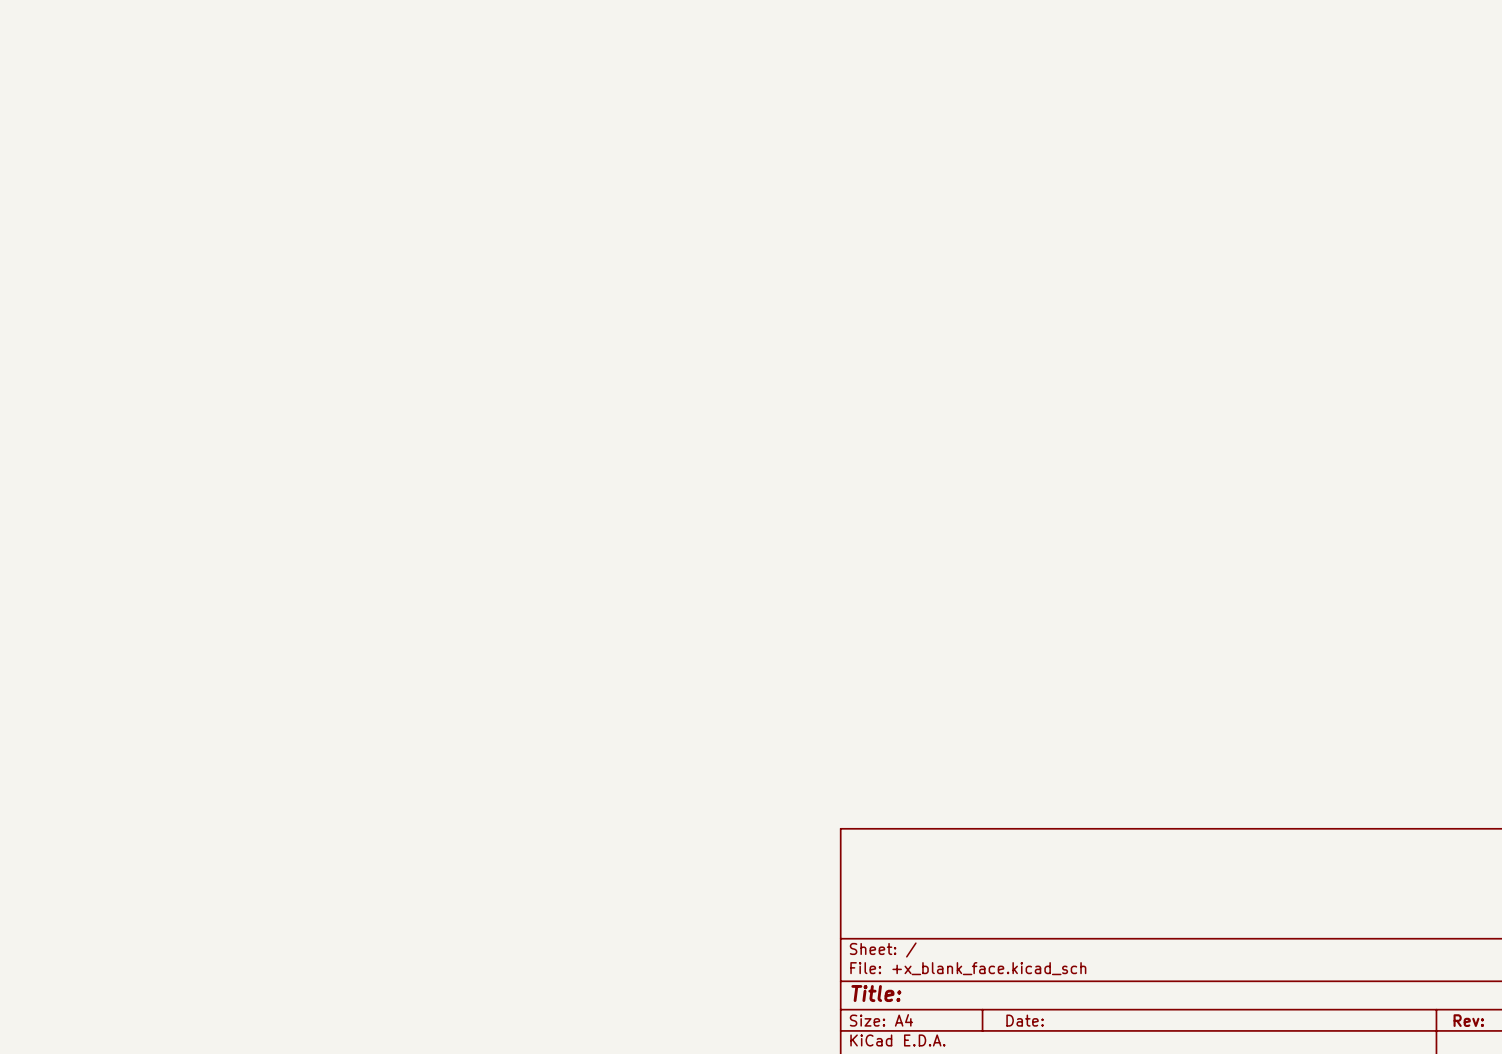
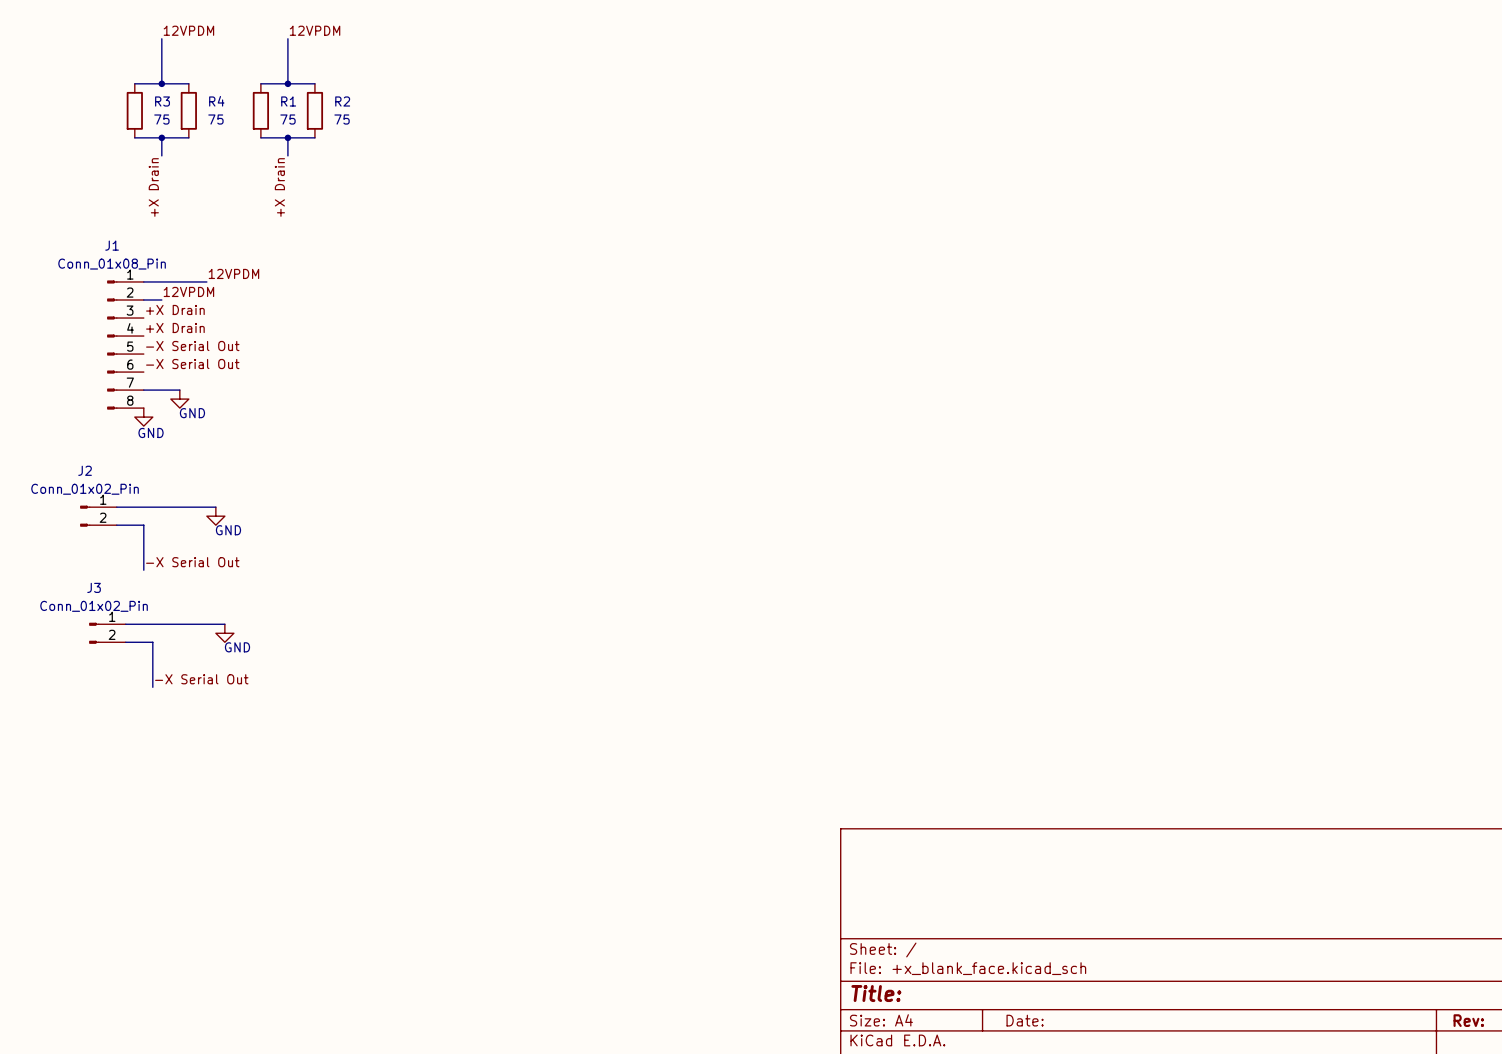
label: none -> 12VPDM (188, 30)
label: none -> 12VPDM (315, 30)
wire: none -> (161, 38) (161, 83)
wire: none -> (287, 38) (287, 83)
wire: none -> (134, 83) (188, 83)
junction: none -> (161, 83)
wire: none -> (260, 83) (314, 83)
junction: none -> (287, 83)
R3: none -> 75 (134, 110)
R4: none -> 75 (188, 110)
R1: none -> 75 (260, 110)
R2: none -> 75 (314, 110)
wire: none -> (134, 137) (188, 137)
wire: none -> (161, 137) (161, 155)
junction: none -> (161, 137)
wire: none -> (260, 137) (314, 137)
wire: none -> (287, 137) (287, 155)
junction: none -> (287, 137)
label: none -> +X Drain (153, 187)
label: none -> +X Drain (279, 187)
label: none -> 12VPDM (233, 273)
wire: none -> (143, 281) (206, 281)
label: none -> 12VPDM (188, 291)
wire: none -> (143, 300) (161, 300)
label: none -> +X Drain (175, 309)
label: none -> +X Drain (175, 327)
J1: none -> Conn_01x08_Pin (125, 345)
label: none -> -X Serial Out (192, 346)
label: none -> -X Serial Out (192, 364)
wire: none -> (143, 390) (179, 390)
power symbol: none -> GND (179, 399)
power symbol: none -> GND (143, 417)
wire: none -> (116, 507) (215, 507)
J2: none -> Conn_01x02_Pin (98, 516)
power symbol: none -> GND (215, 516)
wire: none -> (116, 525) (143, 525) (143, 570)
label: none -> -X Serial Out (192, 562)
wire: none -> (125, 624) (224, 624)
J3: none -> Conn_01x02_Pin (107, 633)
power symbol: none -> GND (224, 633)
wire: none -> (125, 642) (152, 642) (152, 687)
label: none -> -X Serial Out (201, 679)

